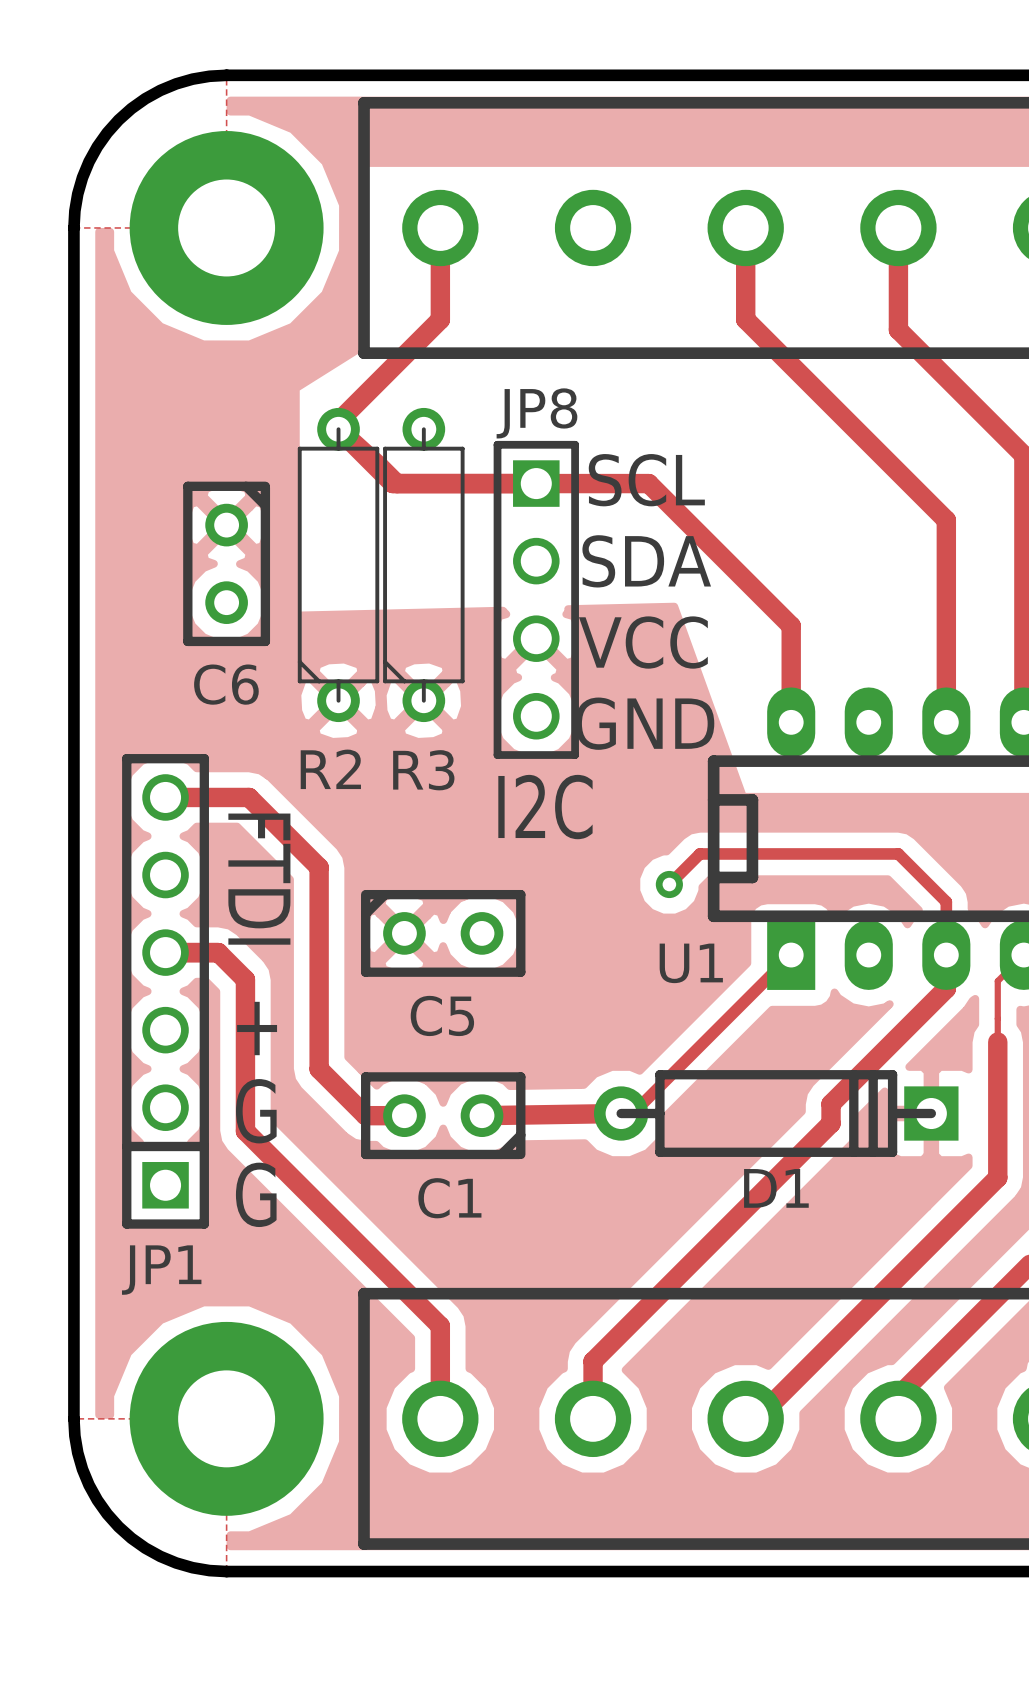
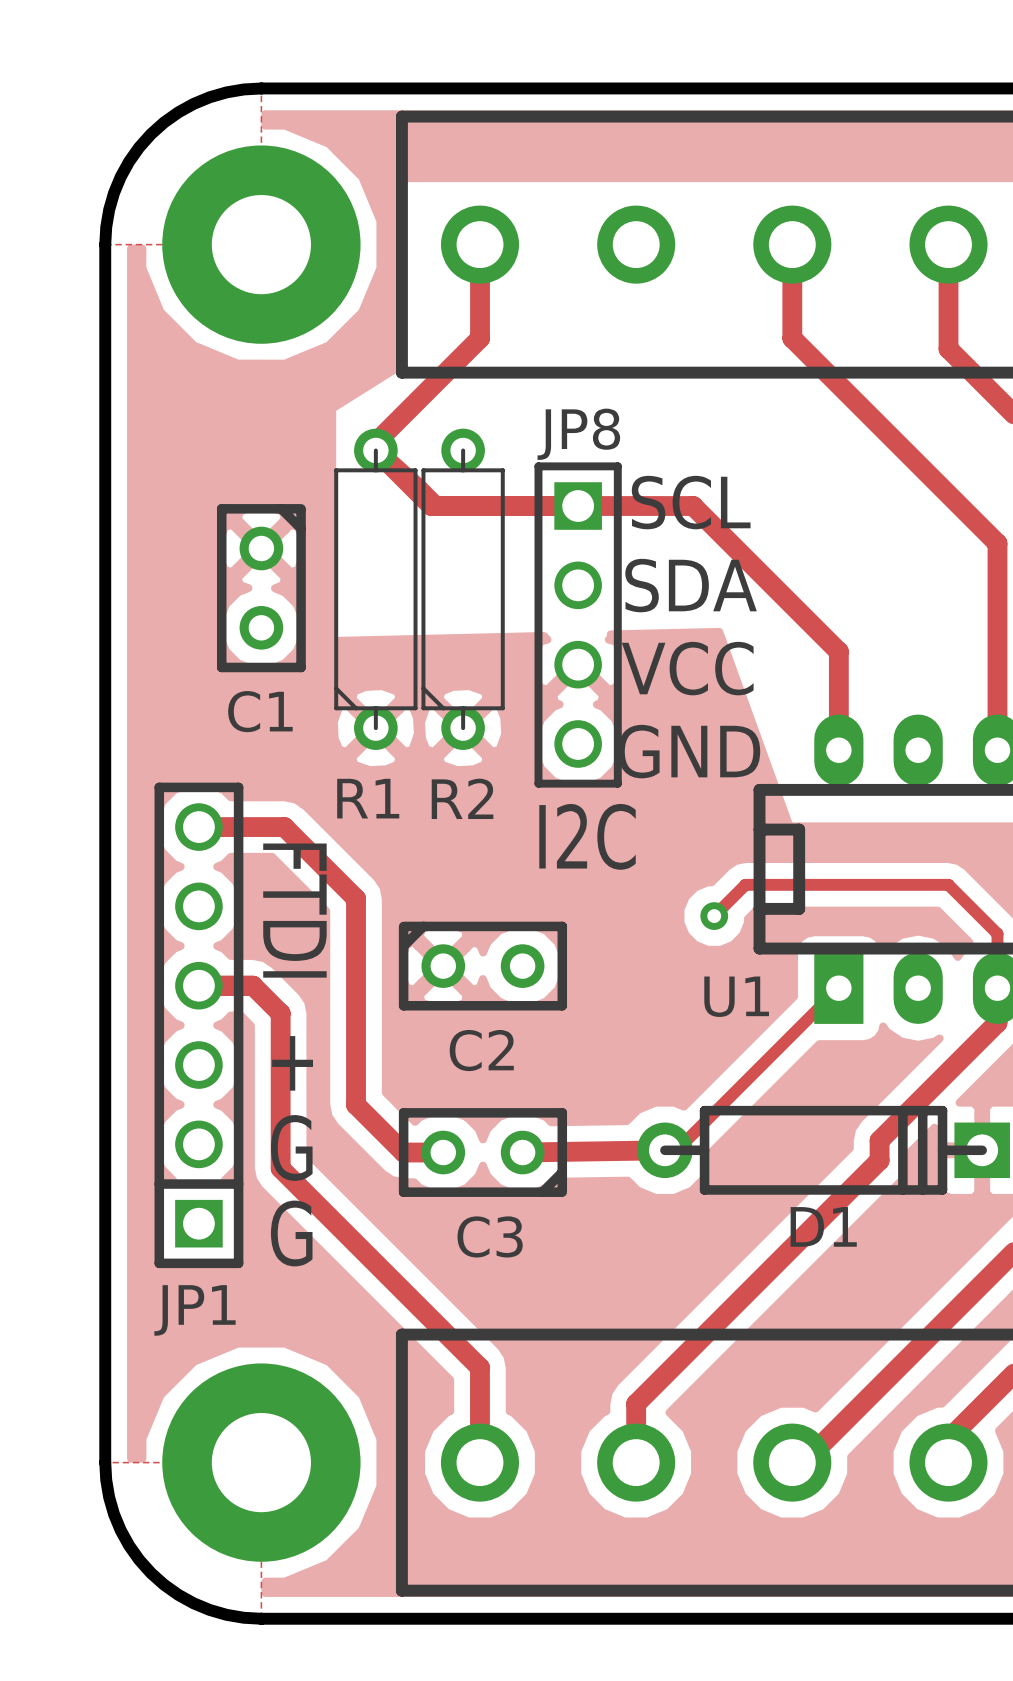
C6 name: C6 (226, 684) -> C1 (260, 711)
R2 name: R2 (330, 769) -> R1 (368, 798)
R3 name: R3 (423, 770) -> R2 (462, 798)
C5 name: C5 (442, 1015) -> C2 (481, 1050)
C1 name: C1 (449, 1198) -> C3 (490, 1236)

